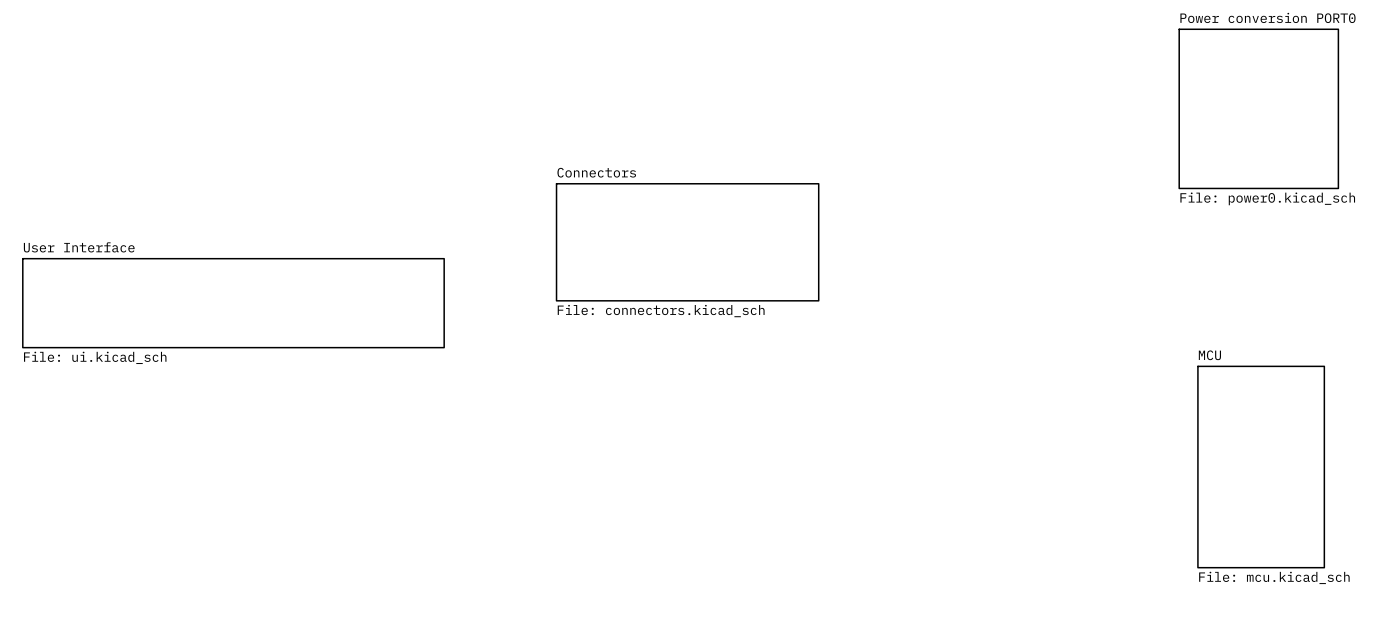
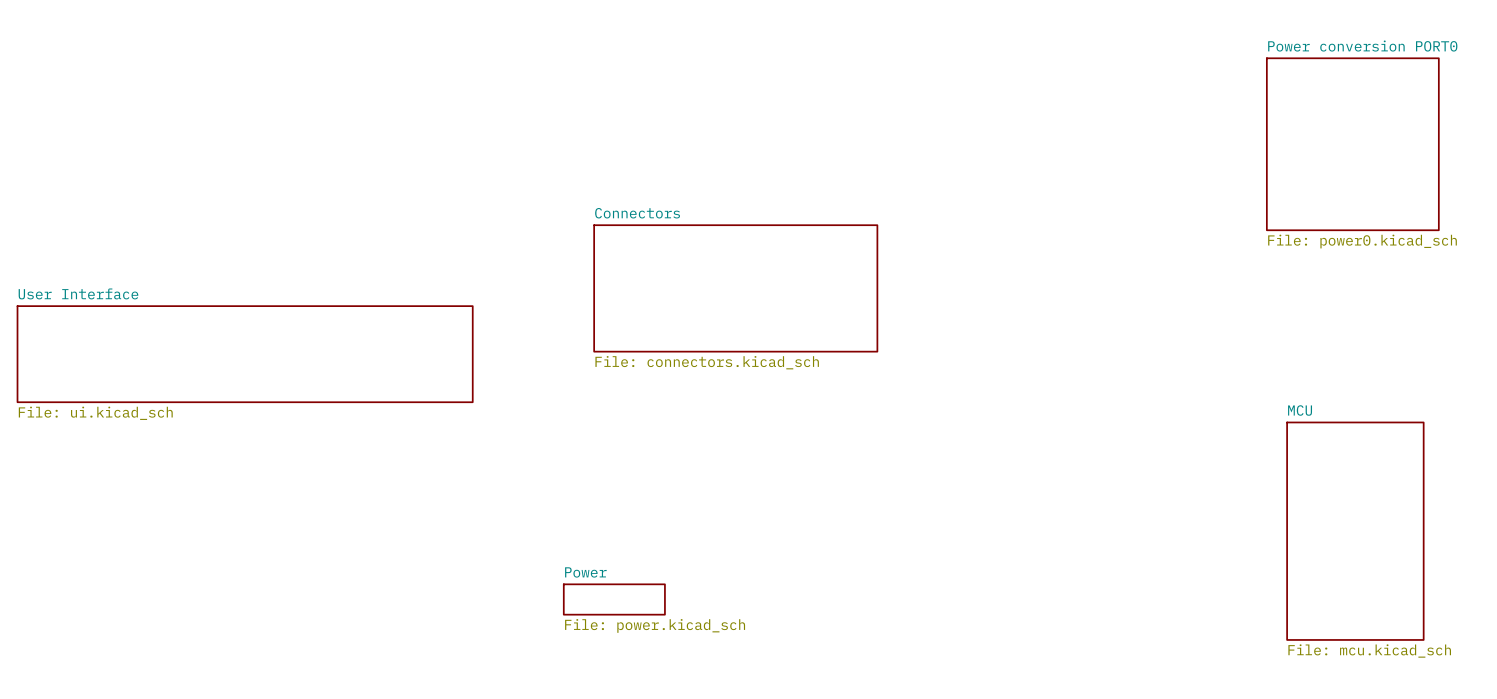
sheet Power: none -> File: power.kicad_sch (614, 599)

